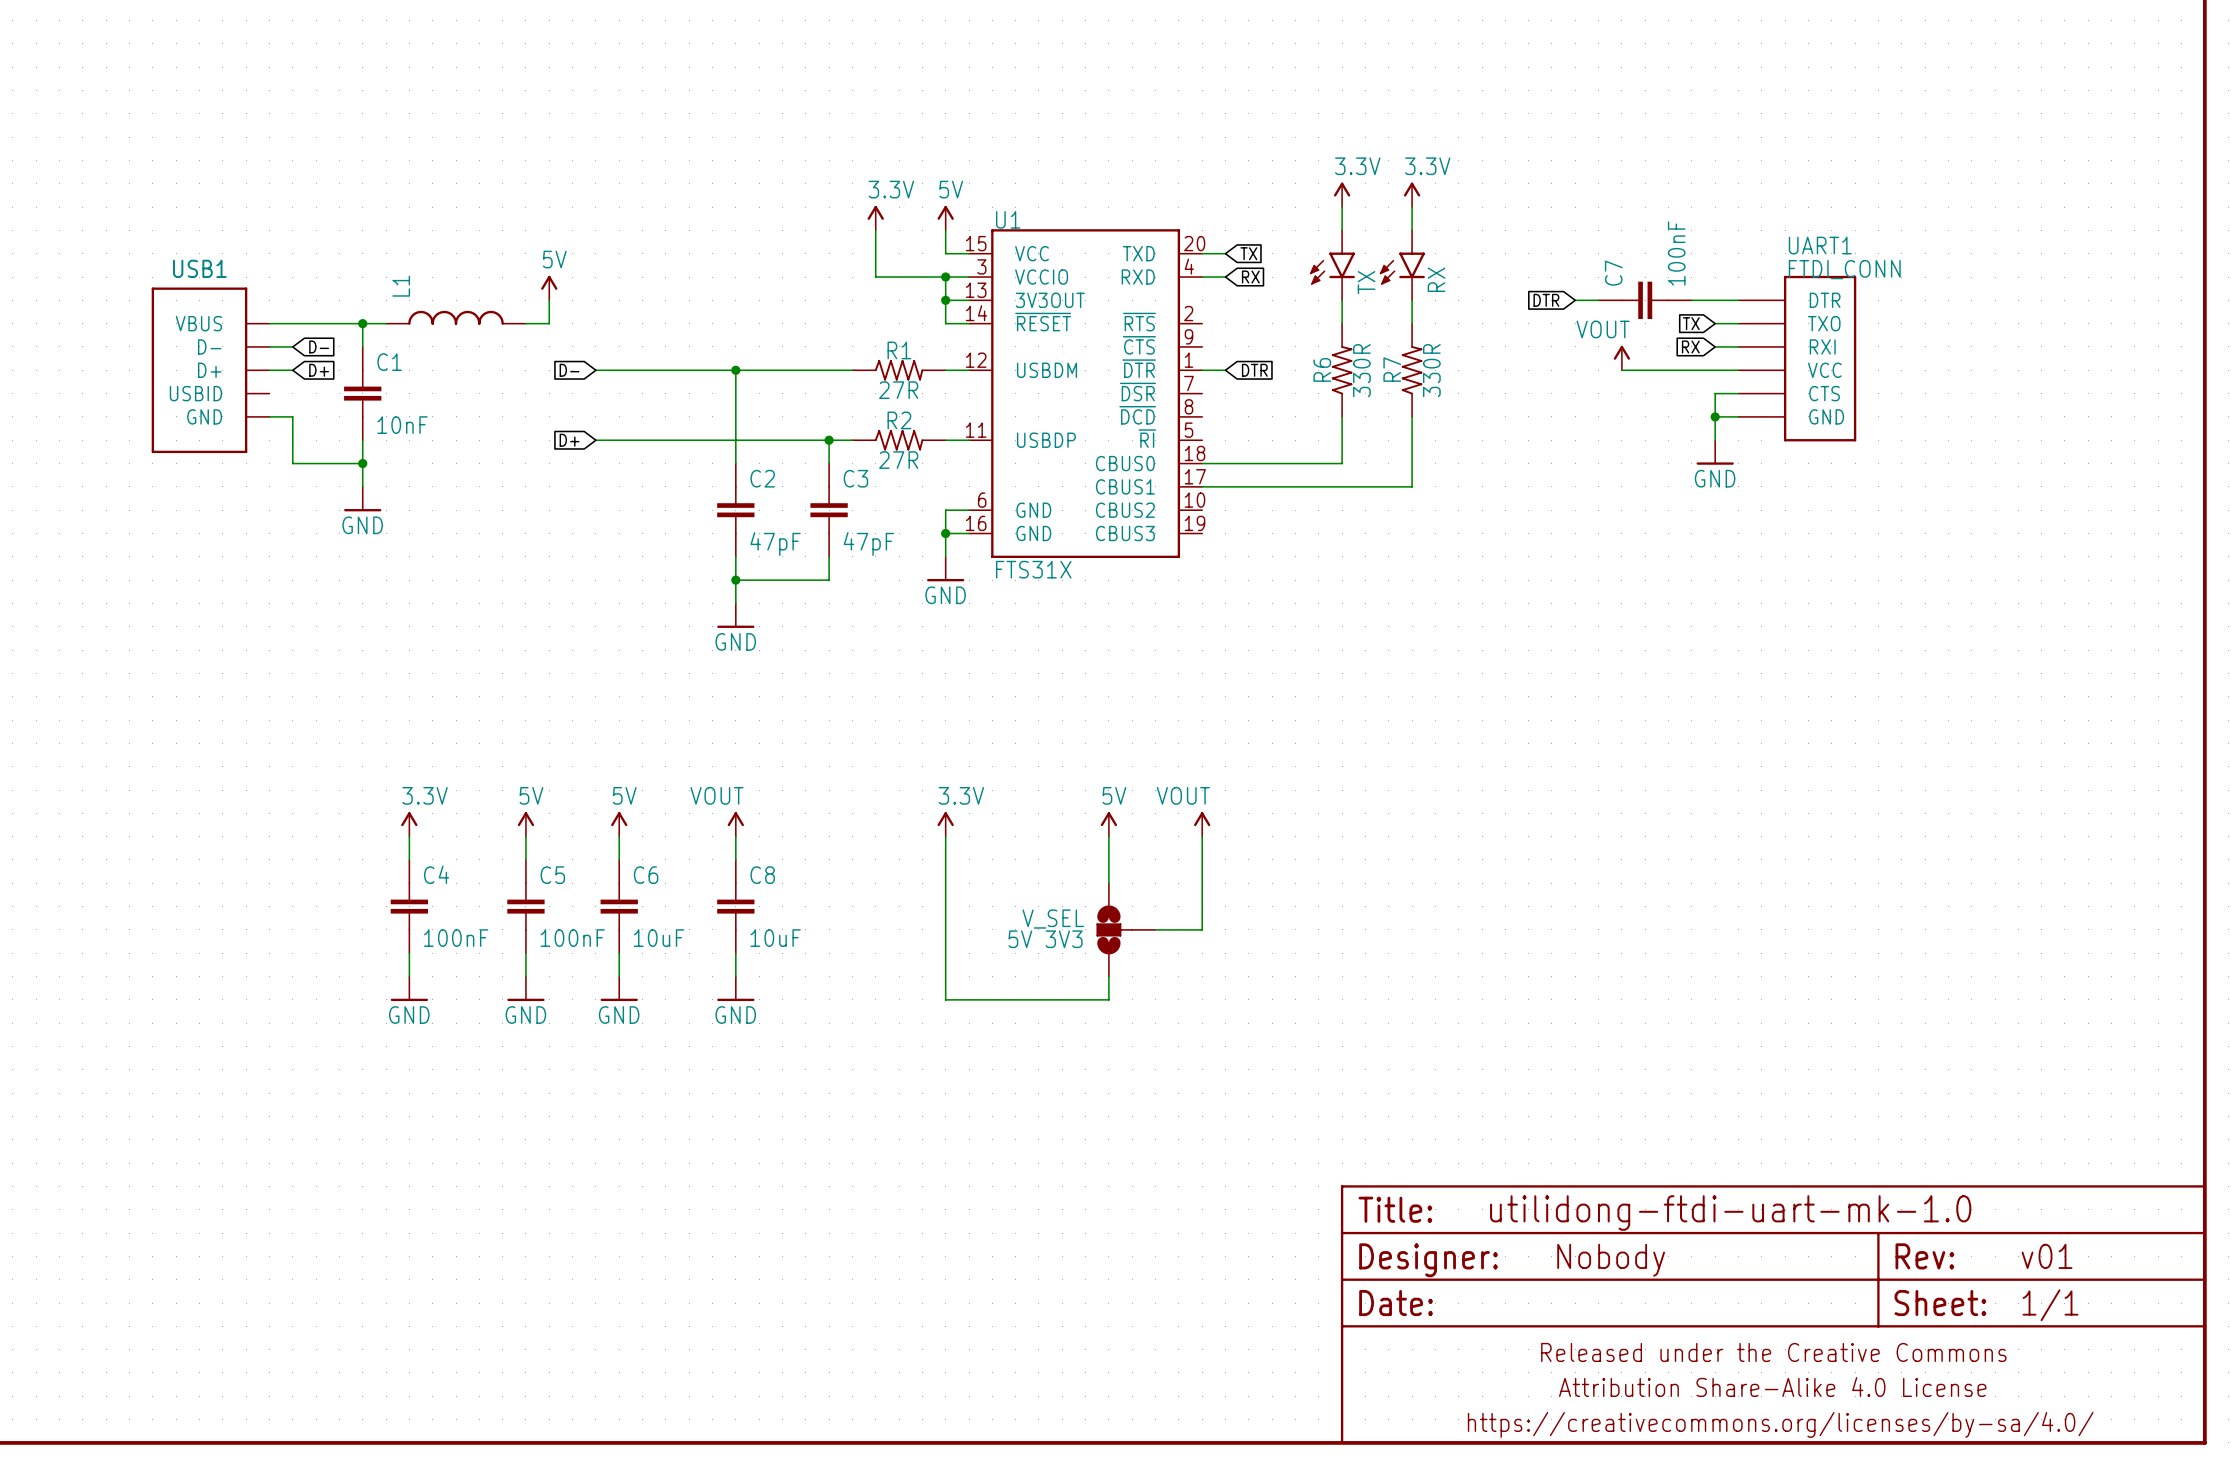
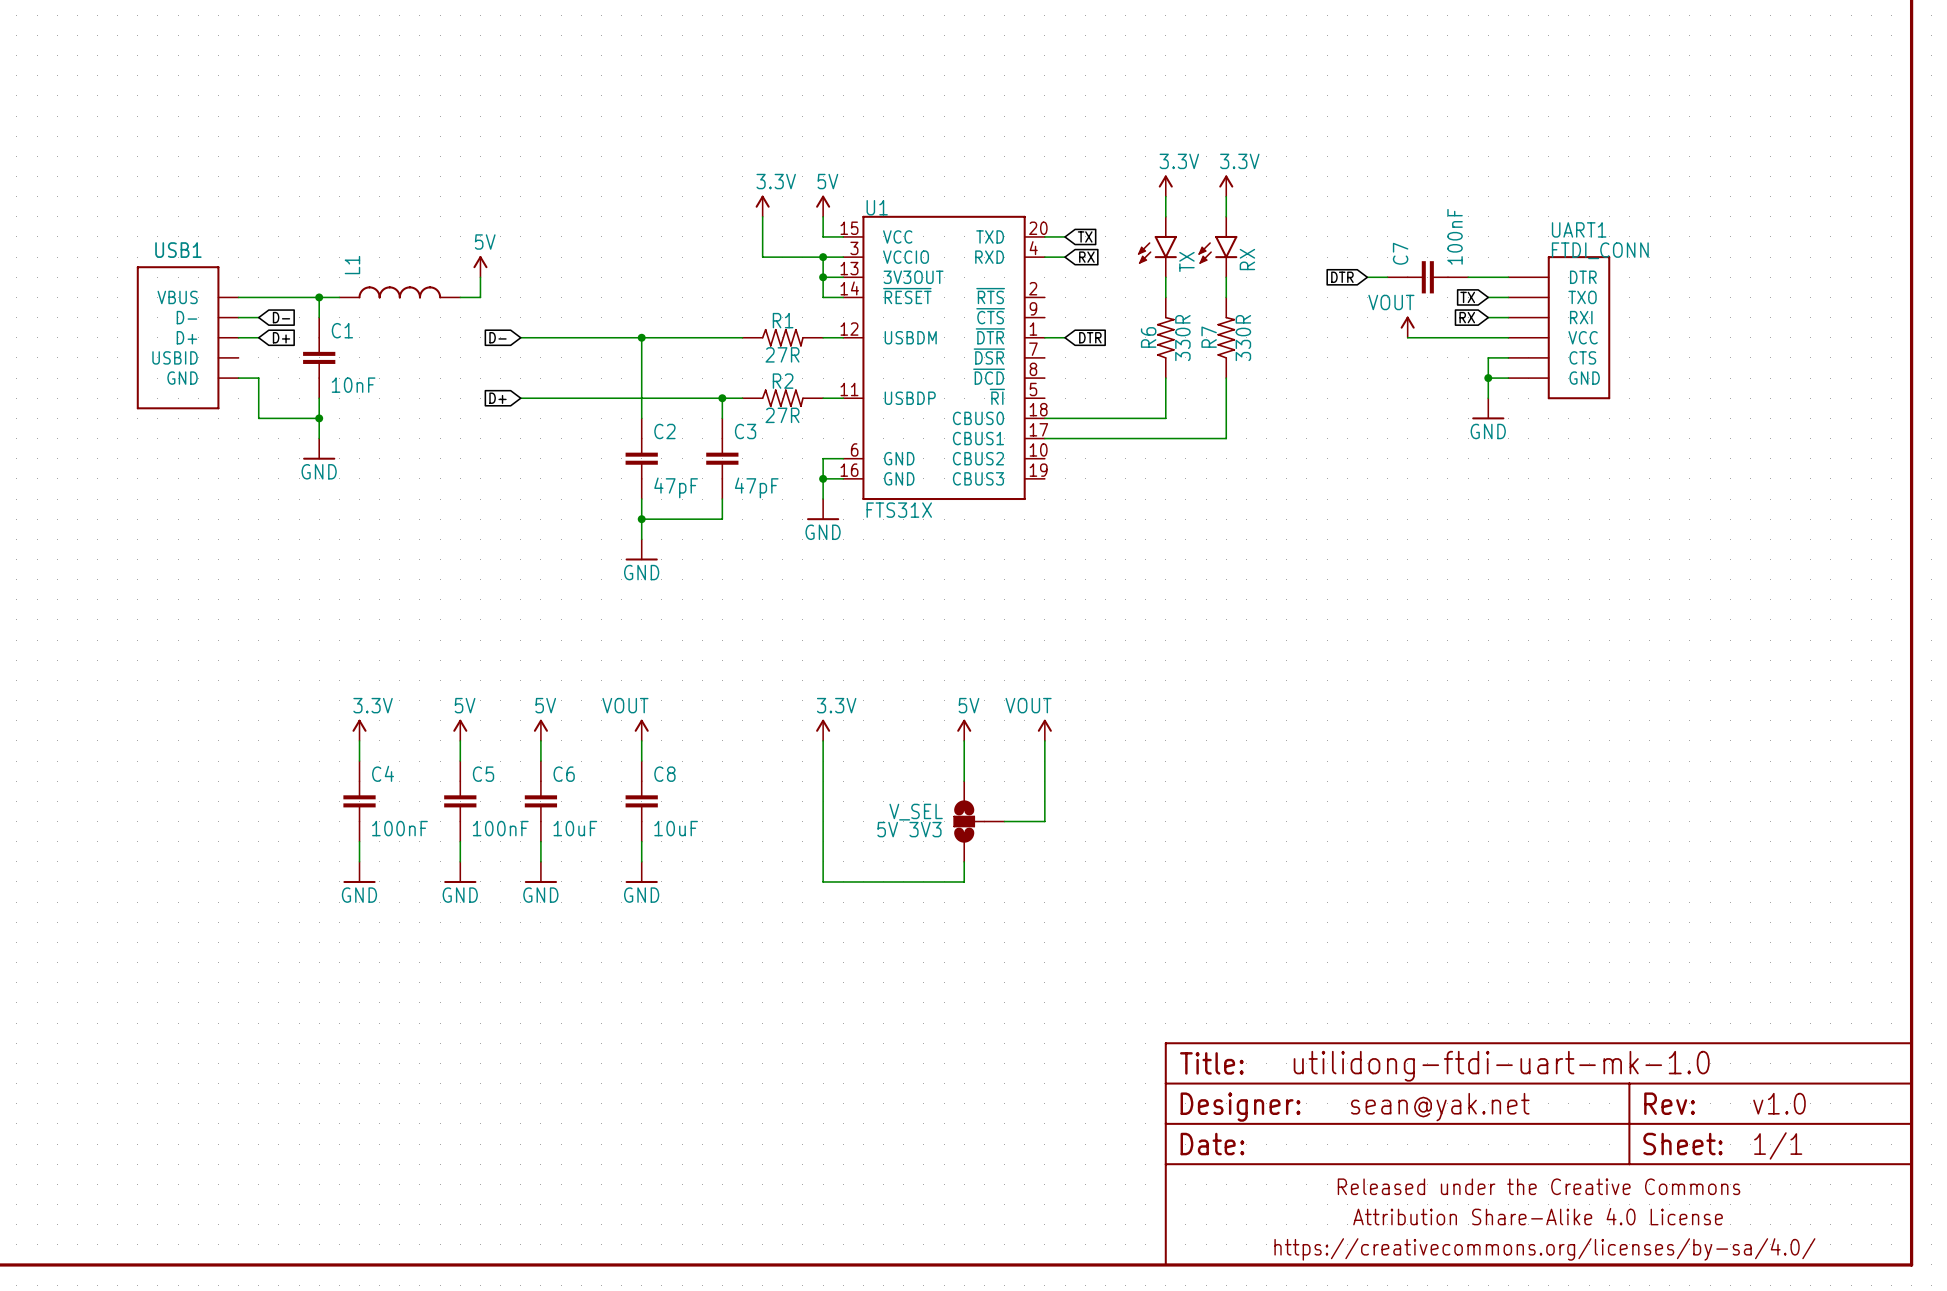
part text: v01 (2047, 1256) -> v1.0 (1779, 1103)
part text: Nobody (1611, 1260) -> sean@yak.net (1440, 1107)

